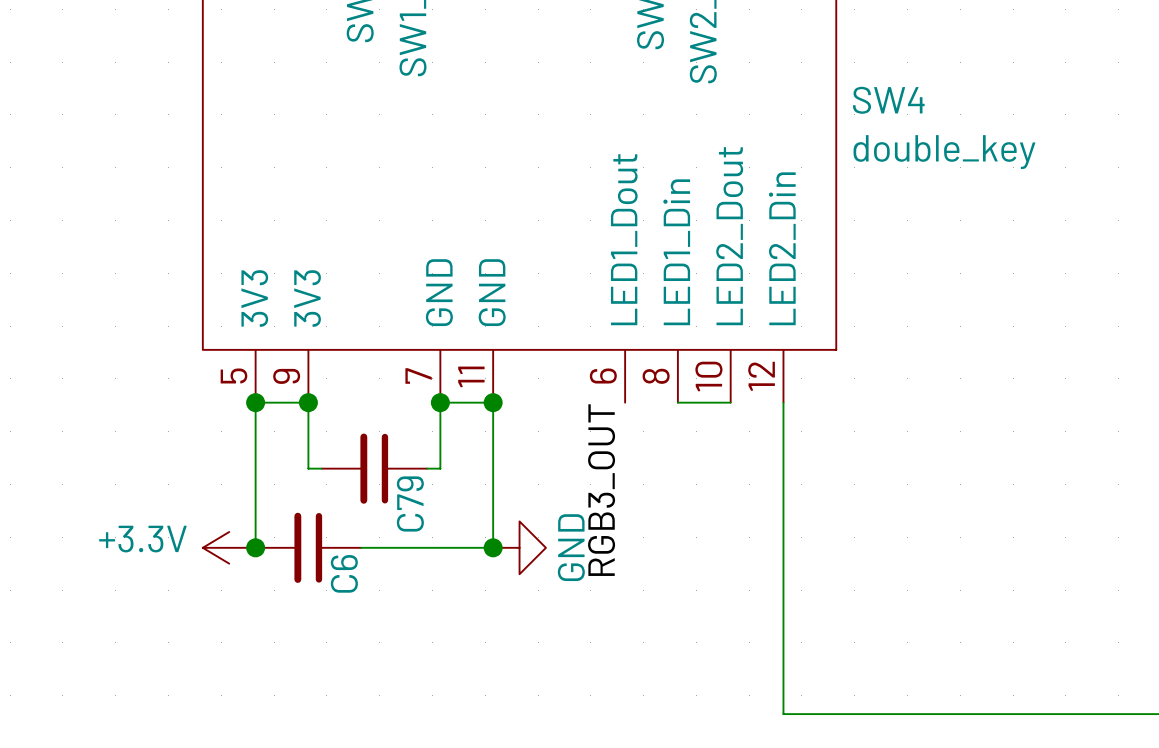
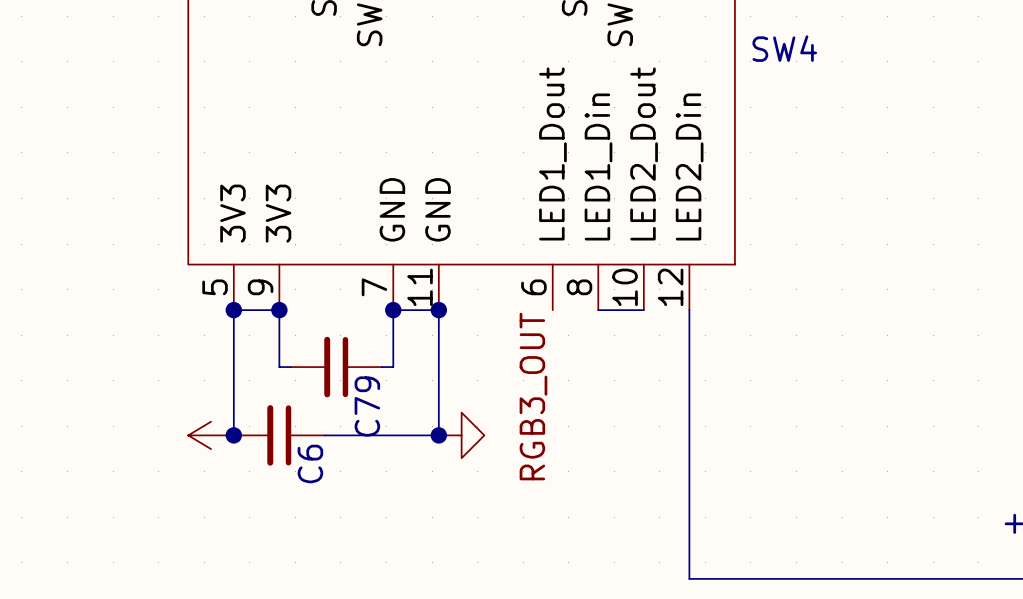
SW4 value: double_key (944, 152) -> none
power symbol text: +3.3V (142, 539) -> none
power symbol text: GND (571, 547) -> none

